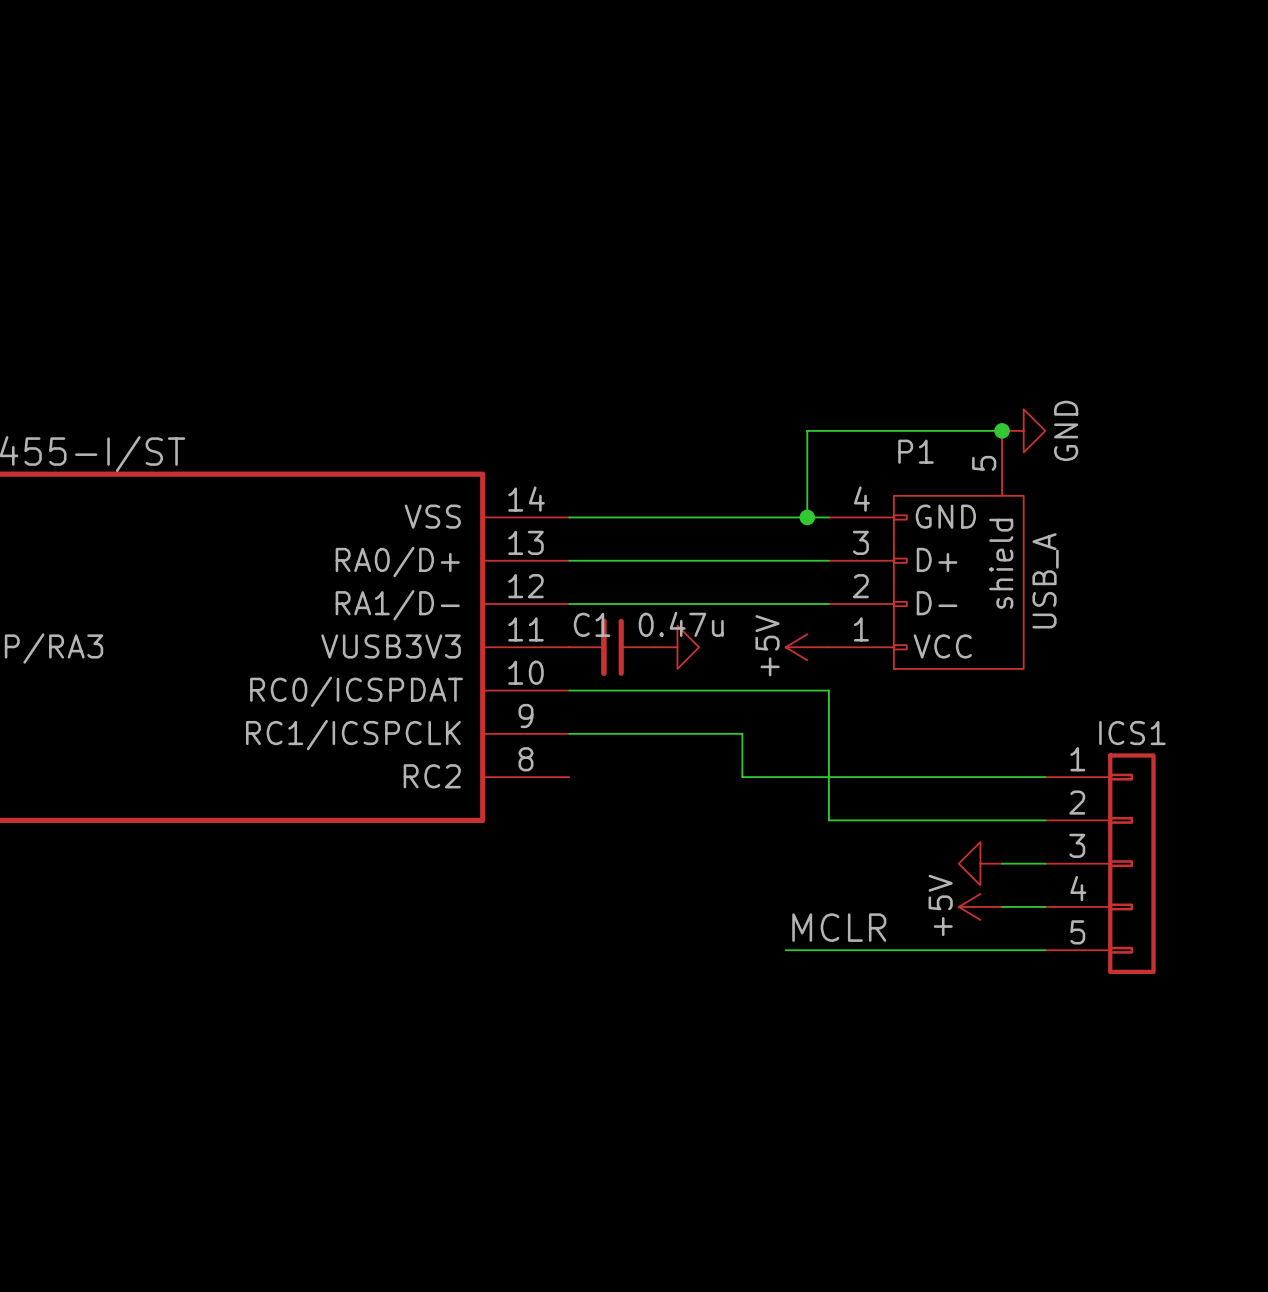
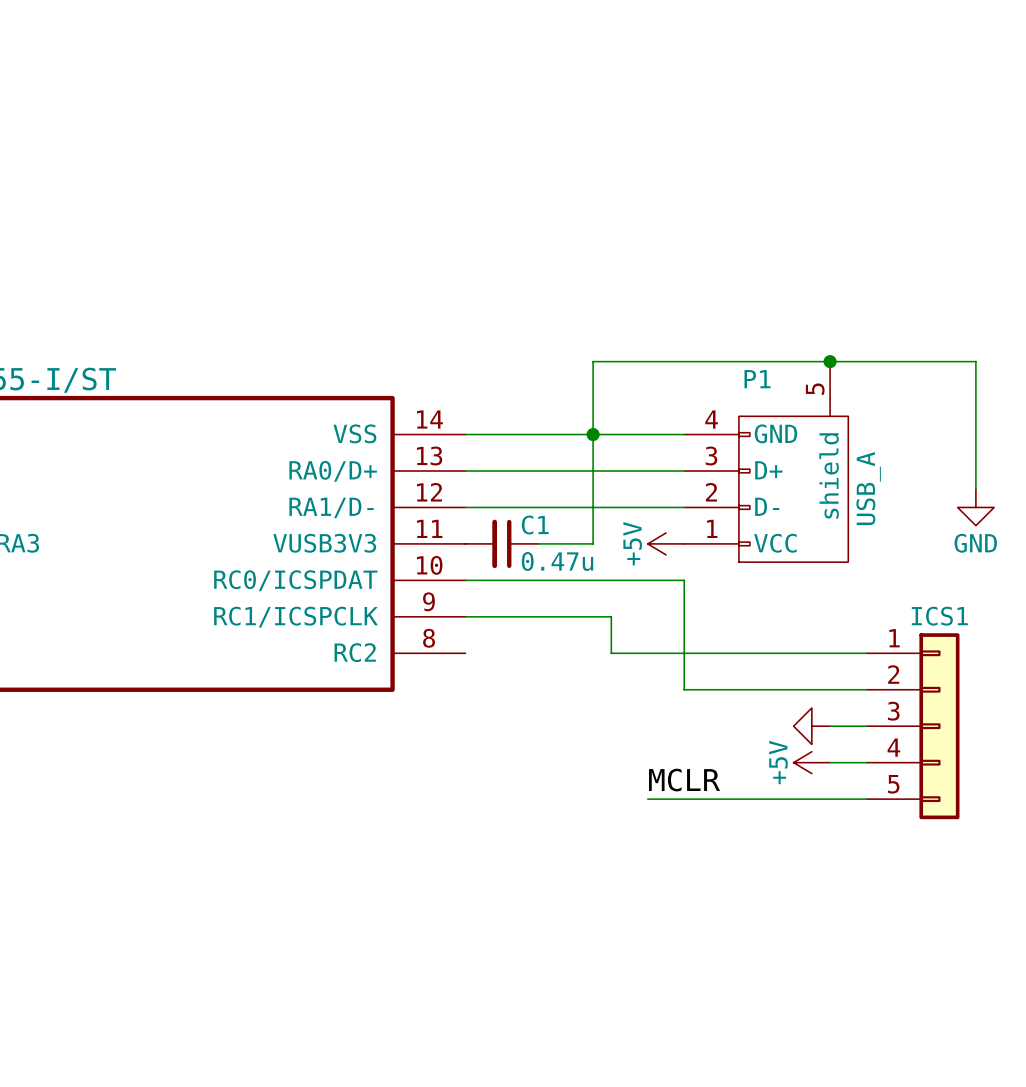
wire: (807, 430) (807, 517) -> (666, 361) (593, 361) (593, 543) (538, 543)
wire: none -> (830, 361) (975, 361) (975, 489)
power symbol rotation: 0° (1023, 430) -> 90° clockwise (975, 507)
power symbol position: GND (1023, 430) -> GND (975, 507)
junction position: (807, 517) -> (593, 434)
C1 name position: C1 (592, 624) -> C1 (535, 525)
C1 value position: 0.47u (681, 624) -> 0.47u (557, 561)
power symbol: (677, 647) -> none

